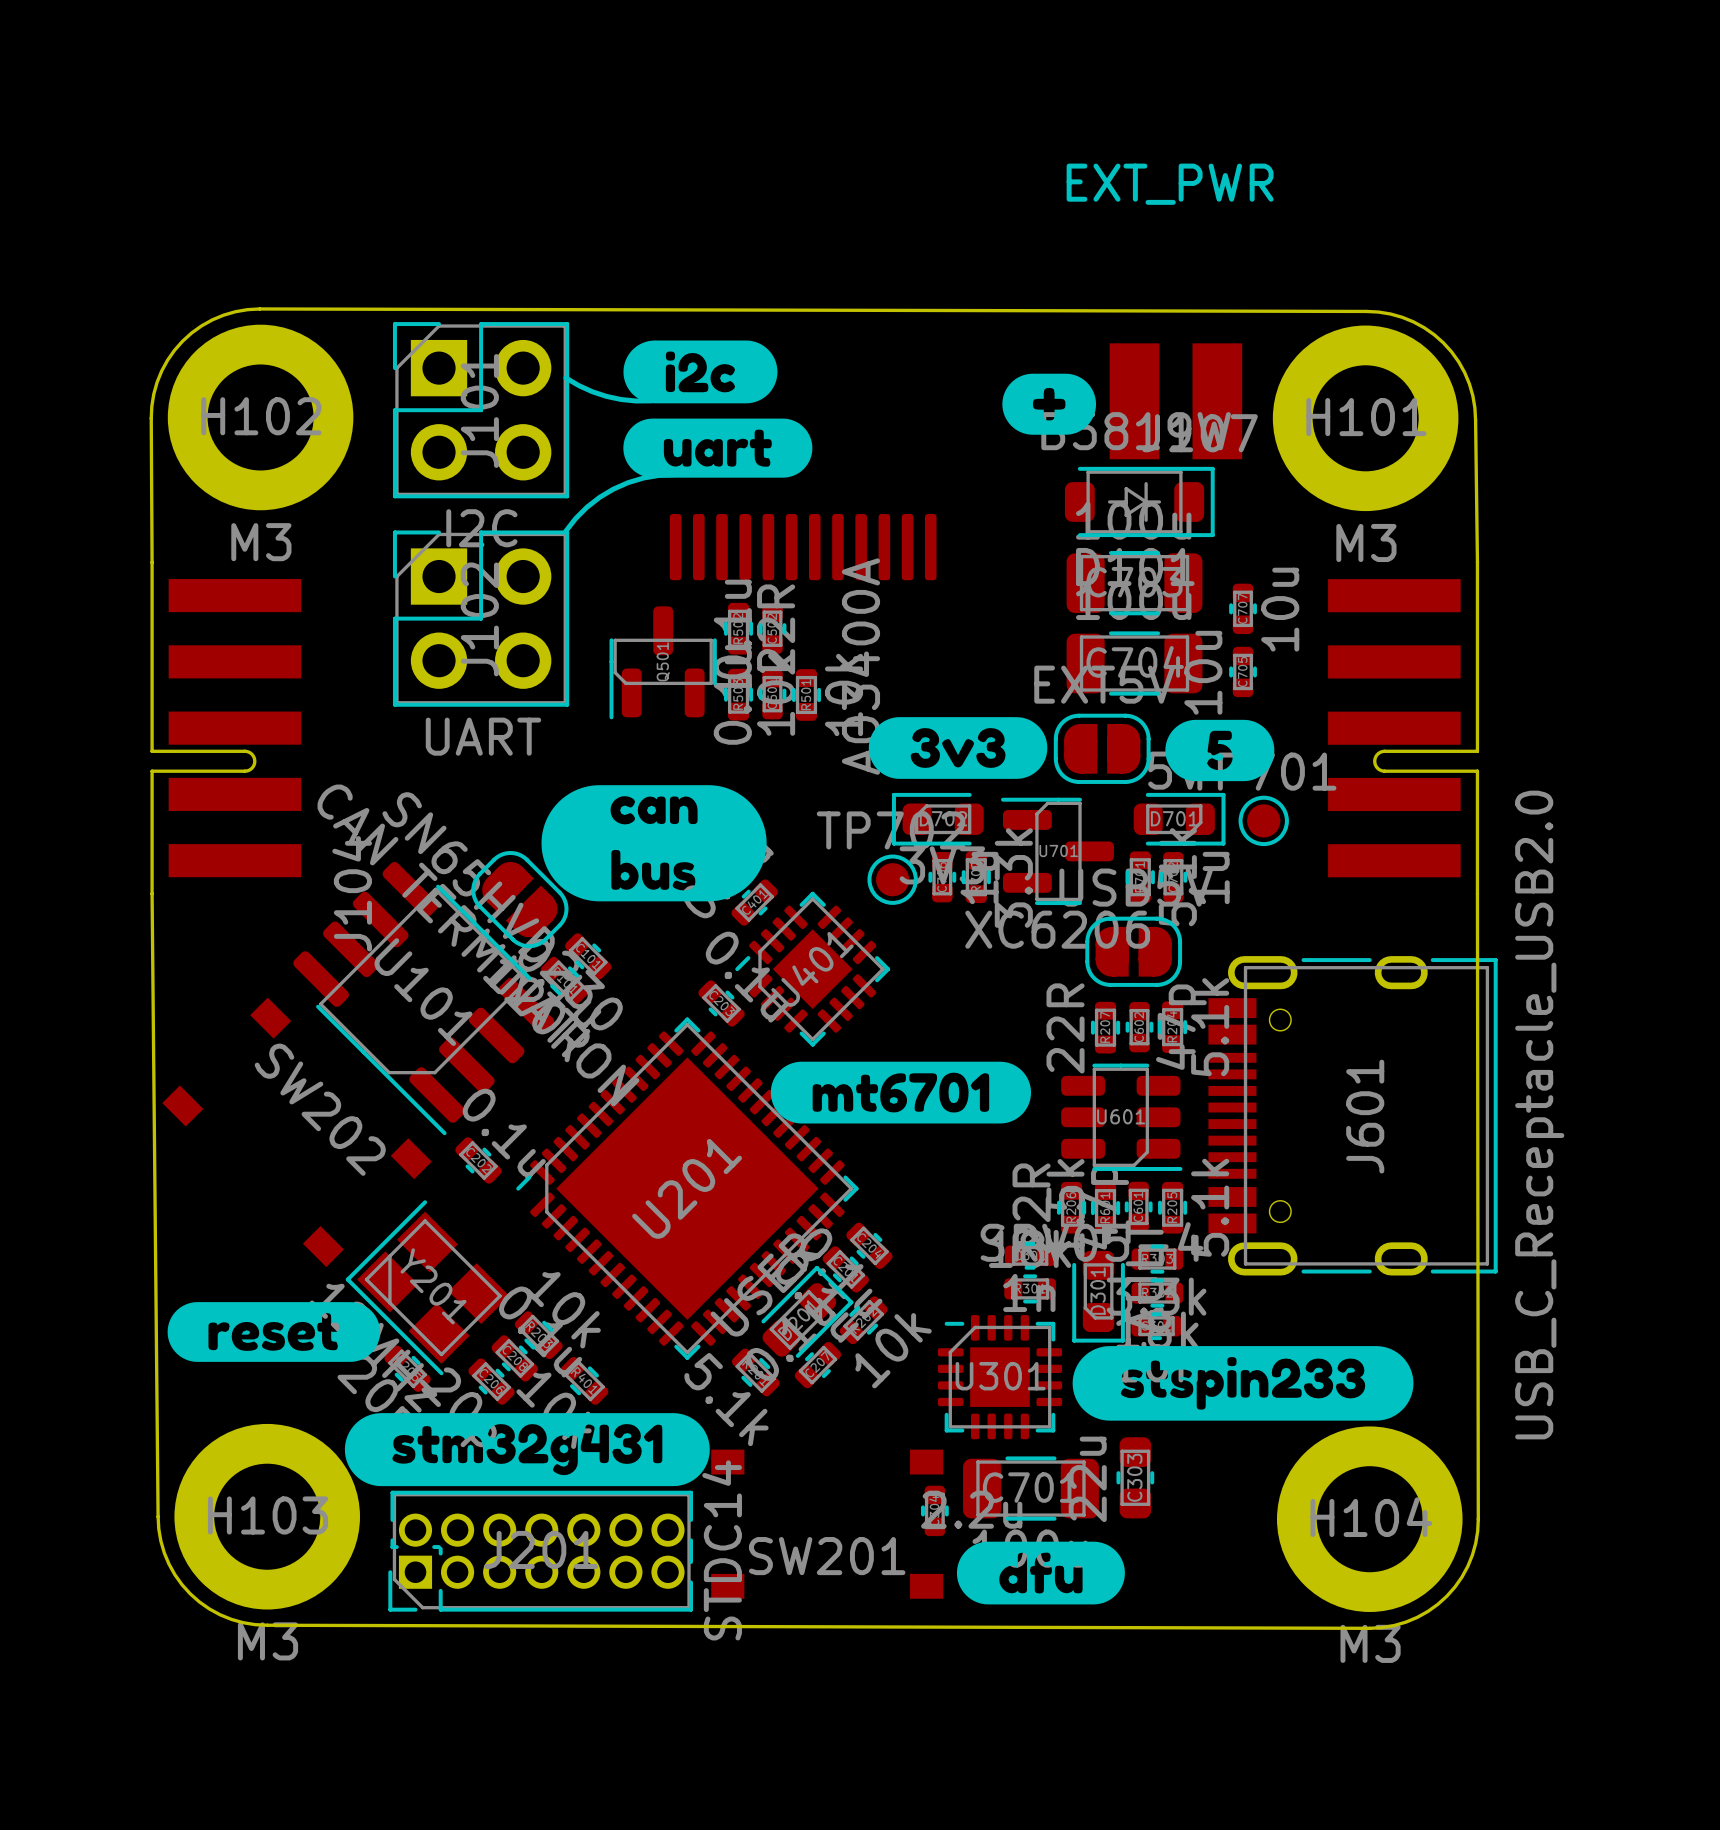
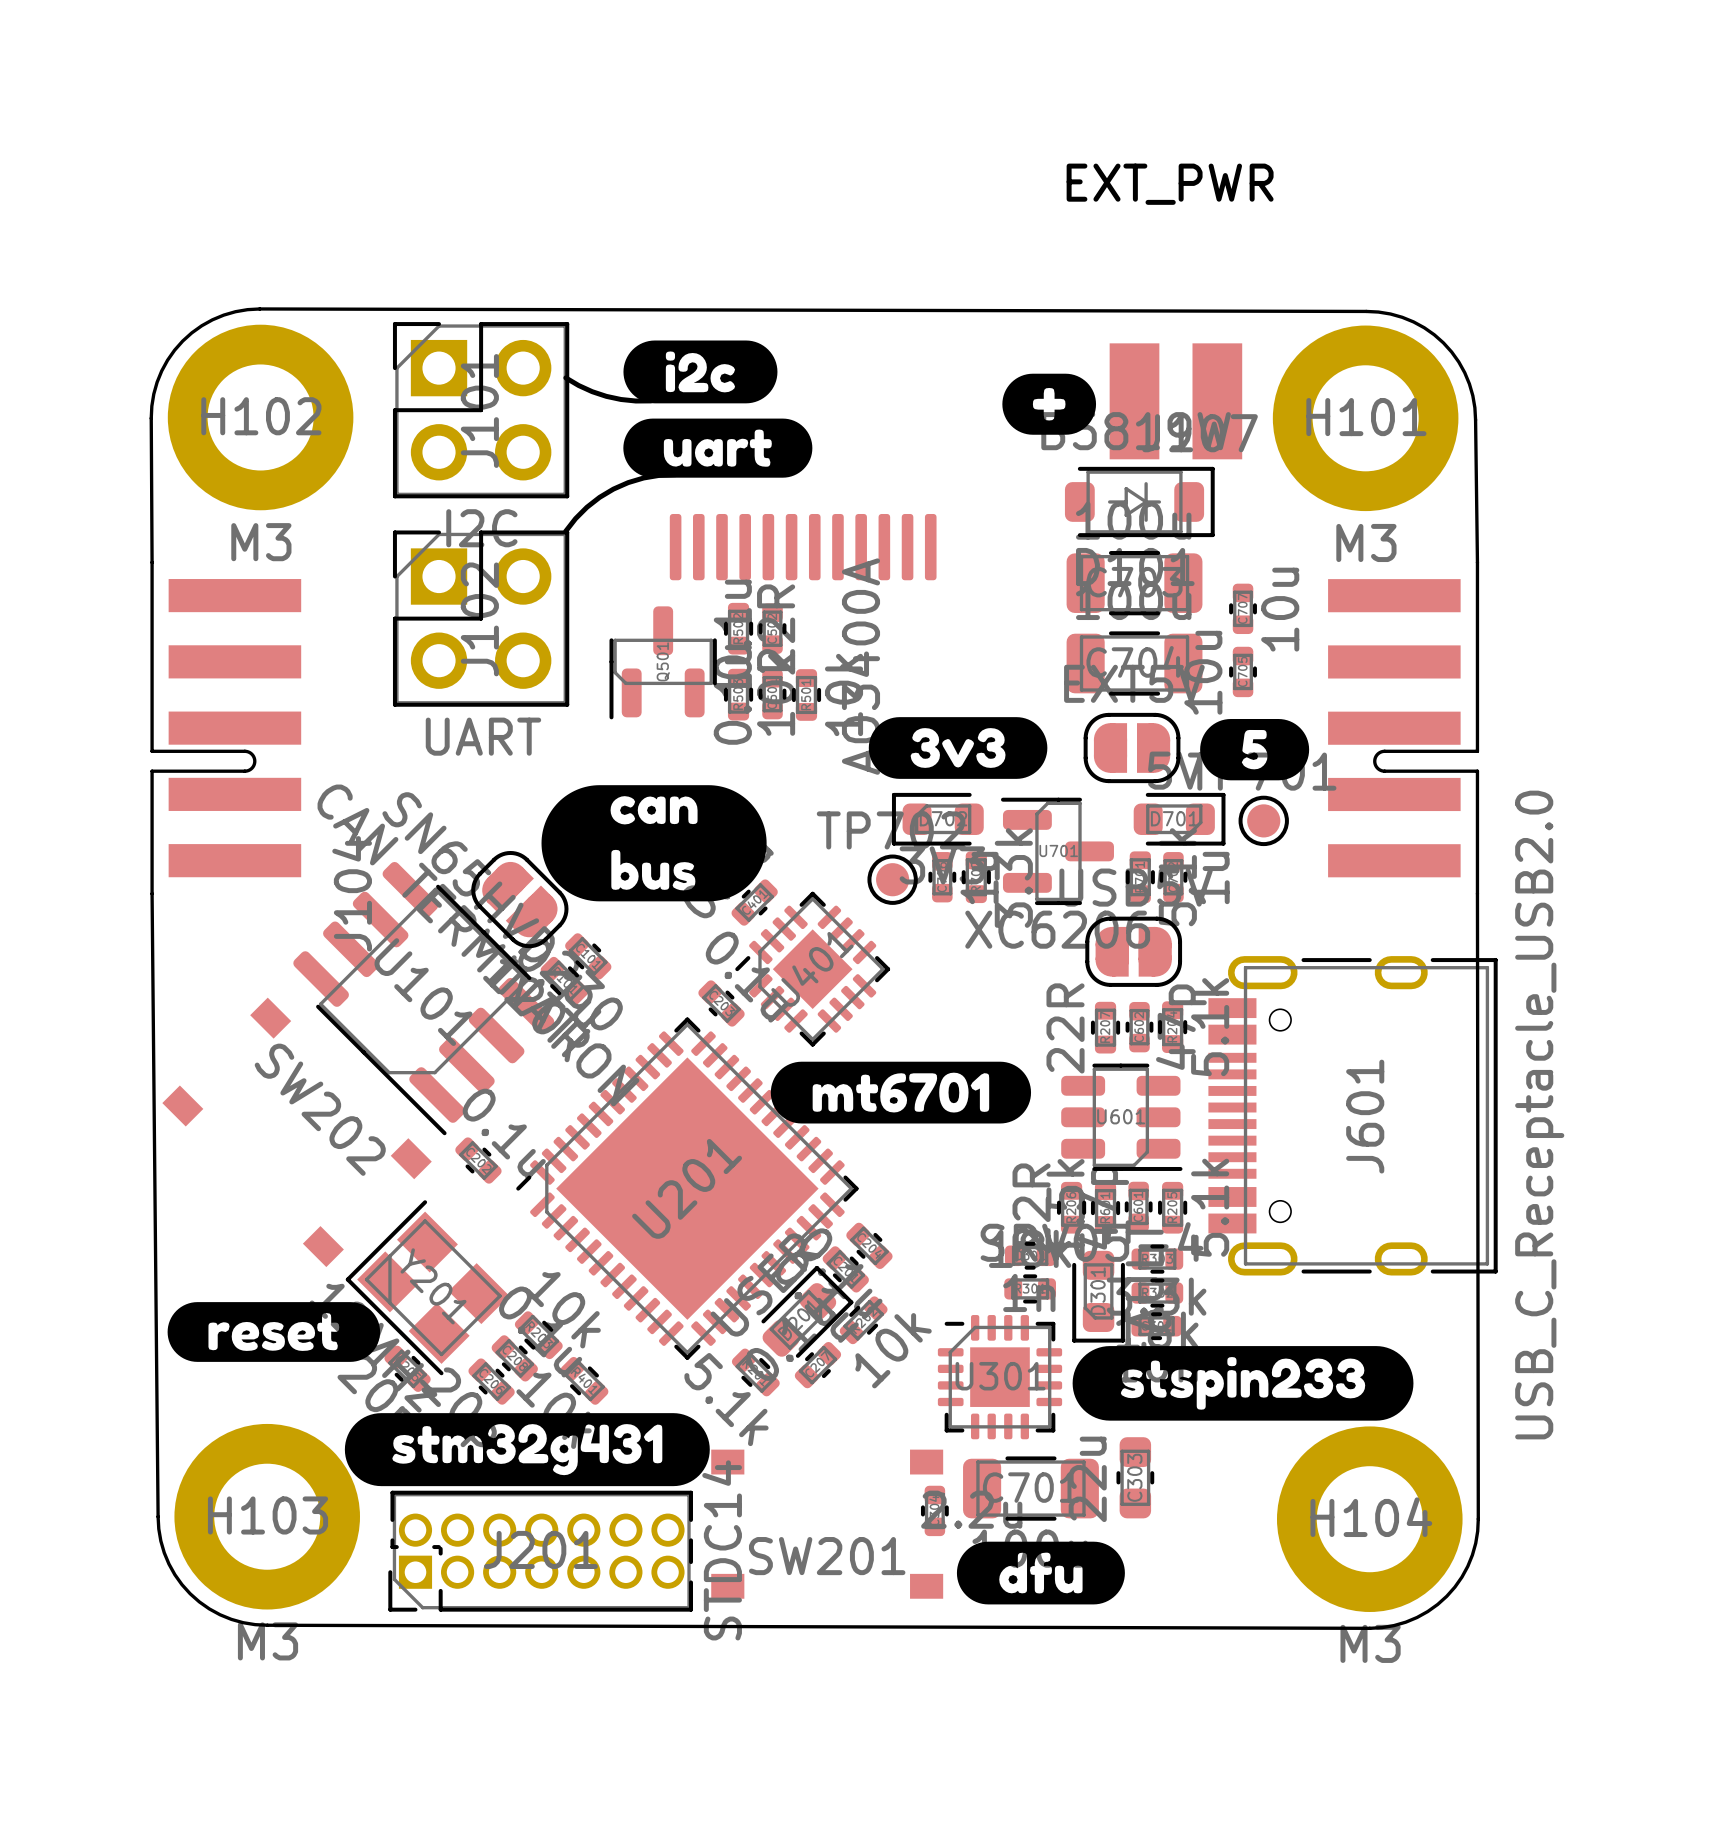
part position: (1102, 748) -> (1132, 748)
drawing position: (1219, 750) -> (1254, 749)

